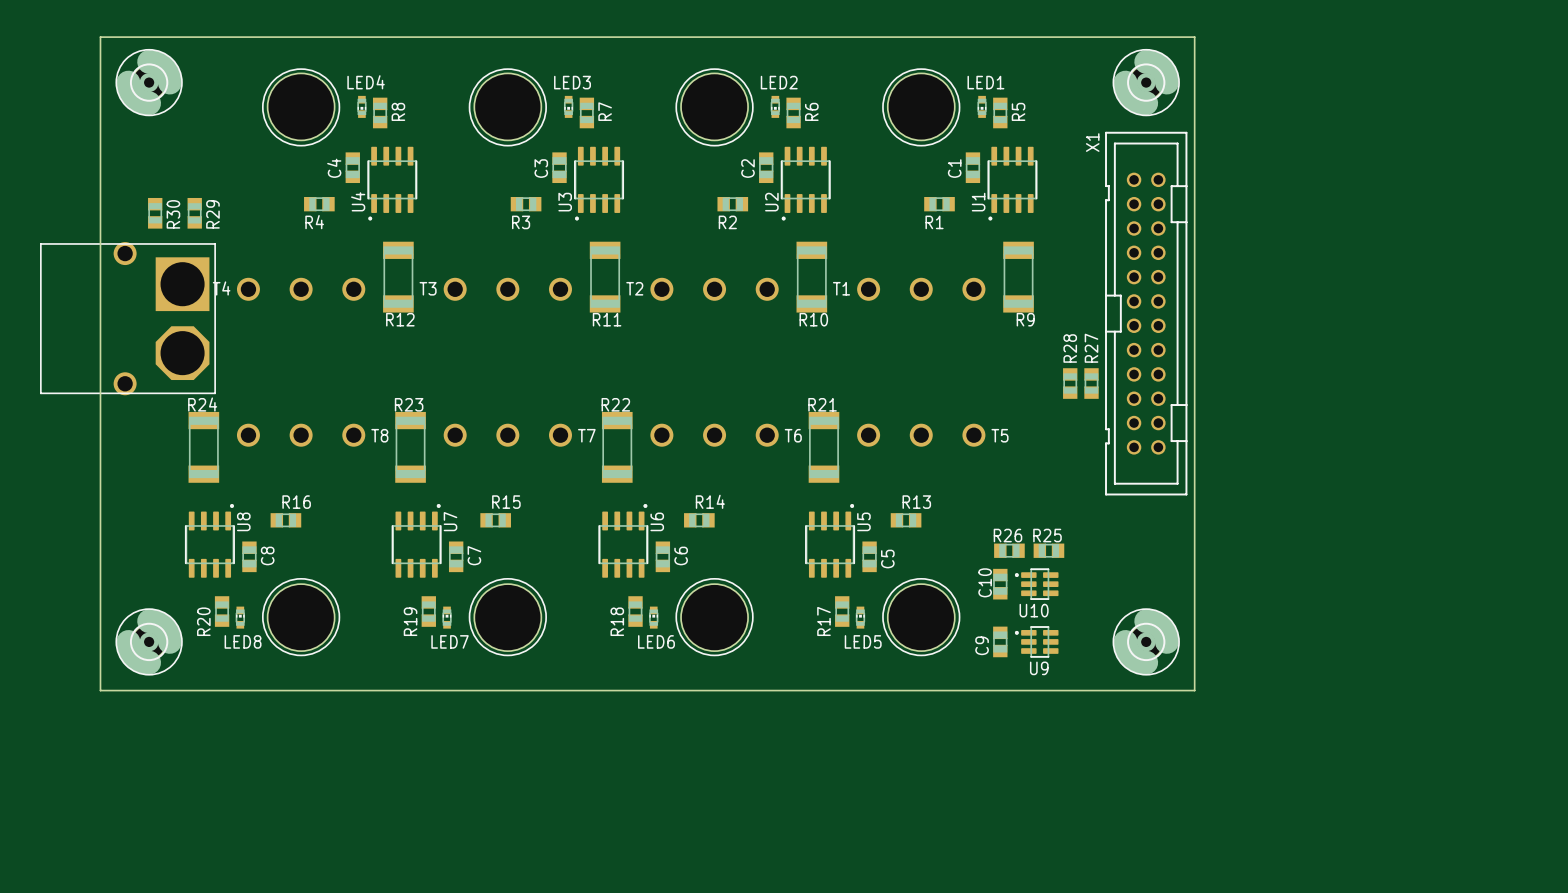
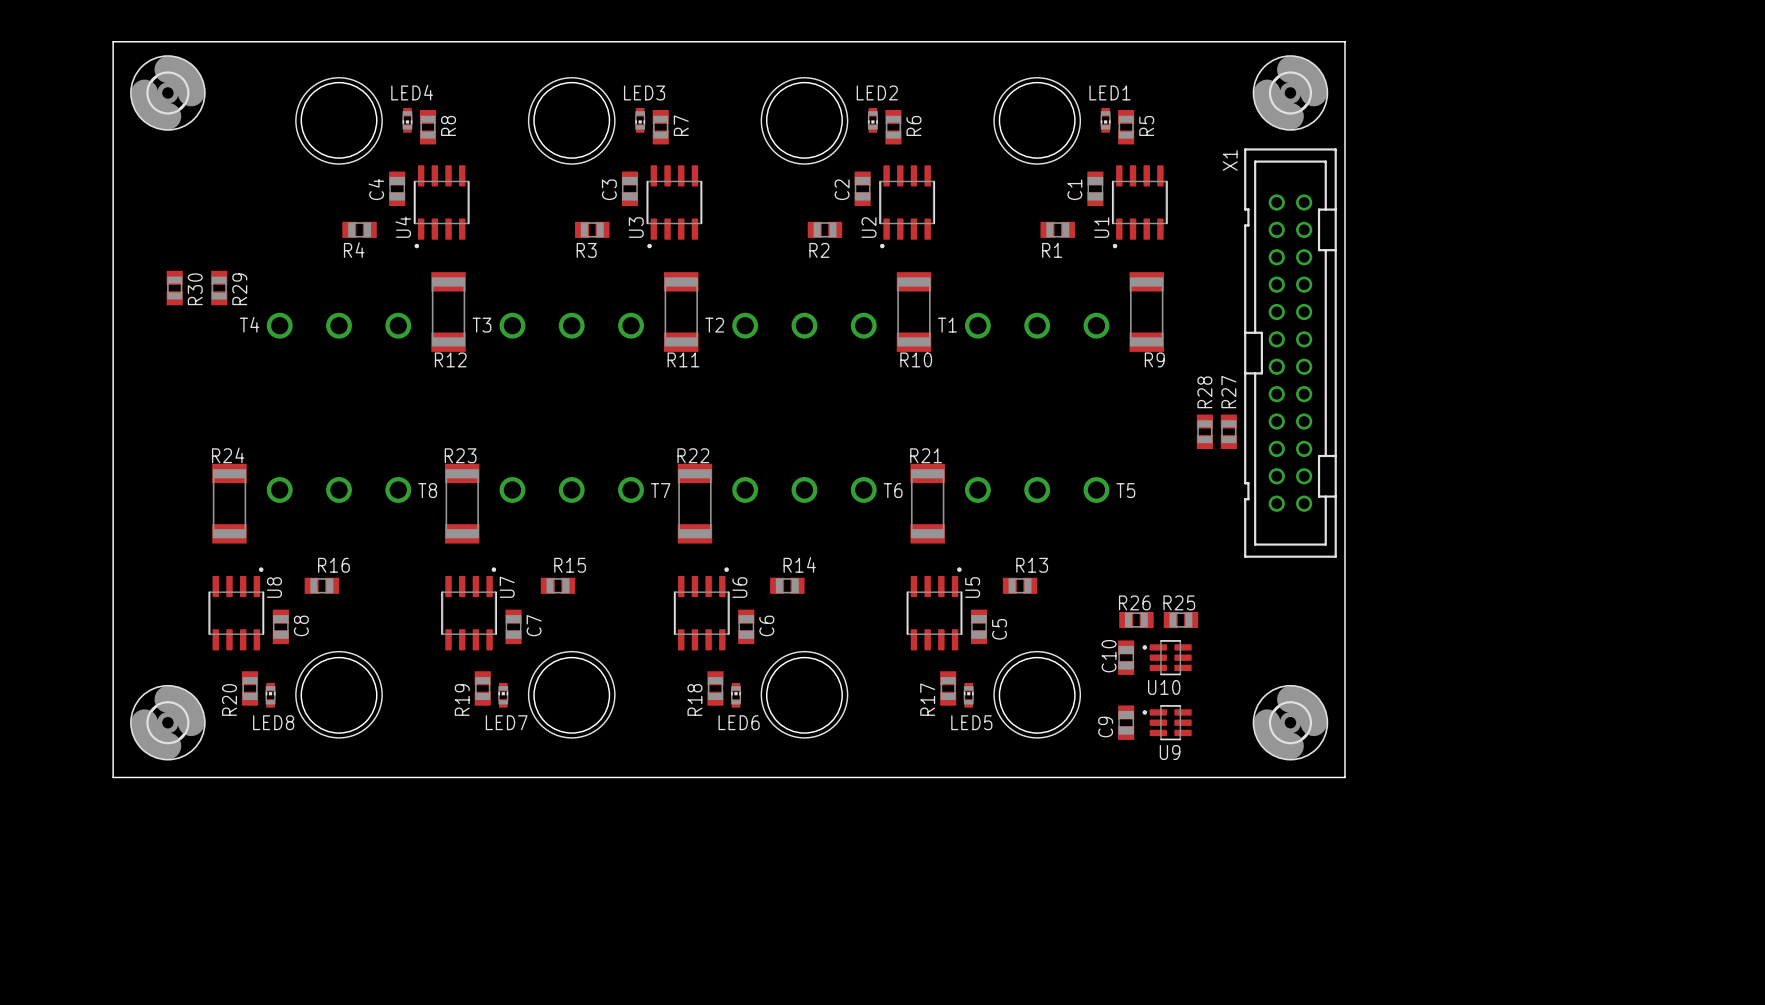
R30 position: (155, 213) -> (174, 288)
R29 position: (194, 213) -> (219, 288)
part: (127, 318) -> none

